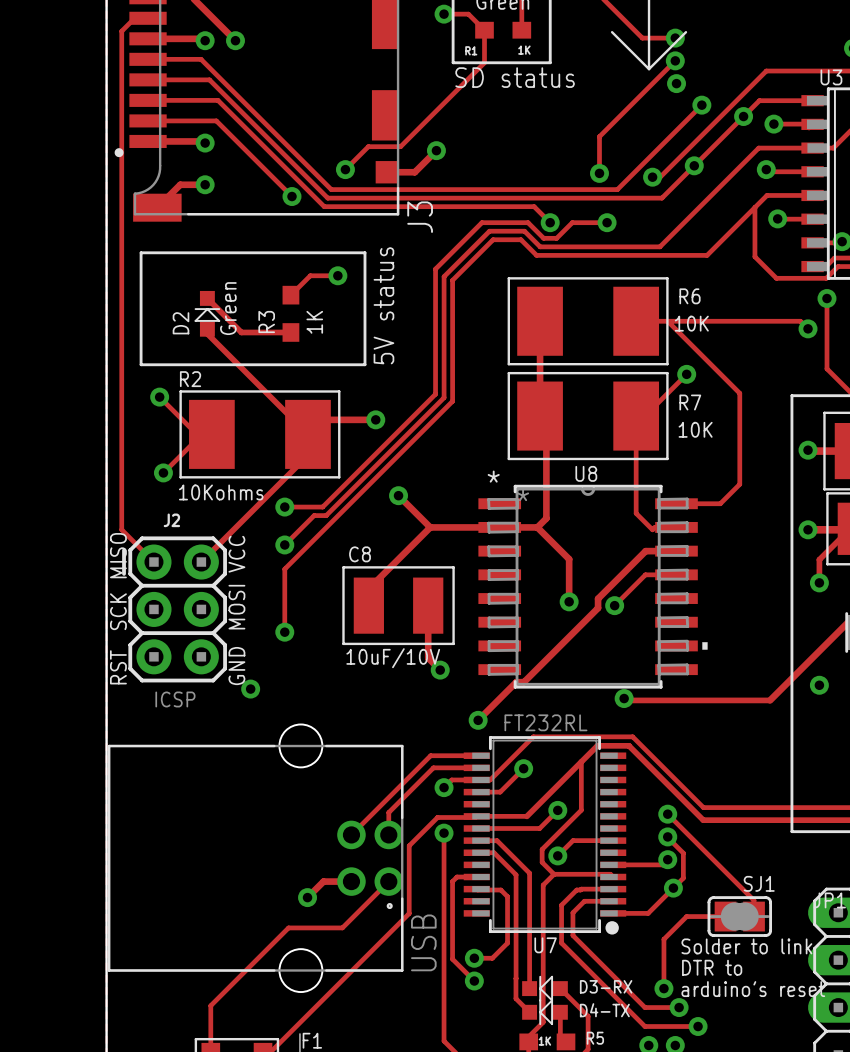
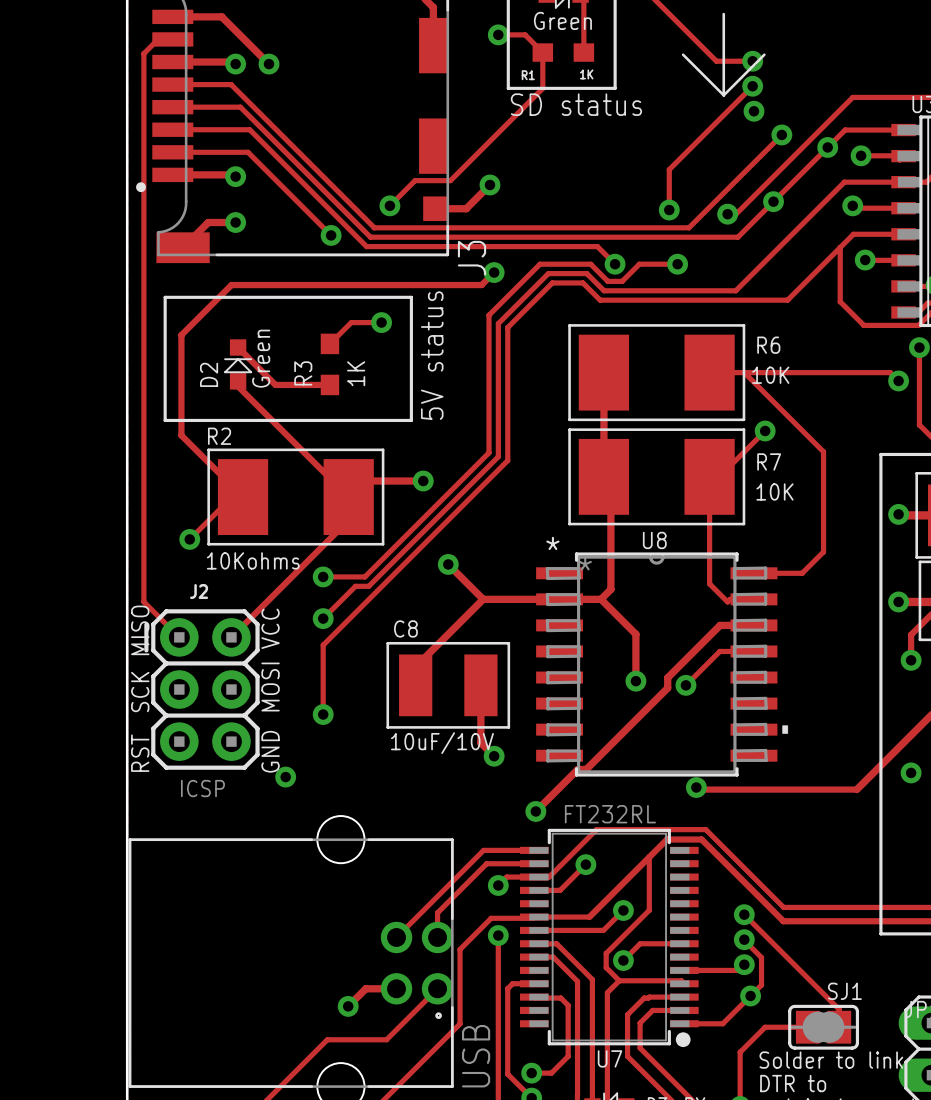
track: none -> (494, 272) (481, 285) (231, 285) (181, 335) (181, 435) (243, 497)
via: none -> (494, 272)
track: (159, 397) (196, 434) (201, 434) -> none
via: (159, 397) -> none

